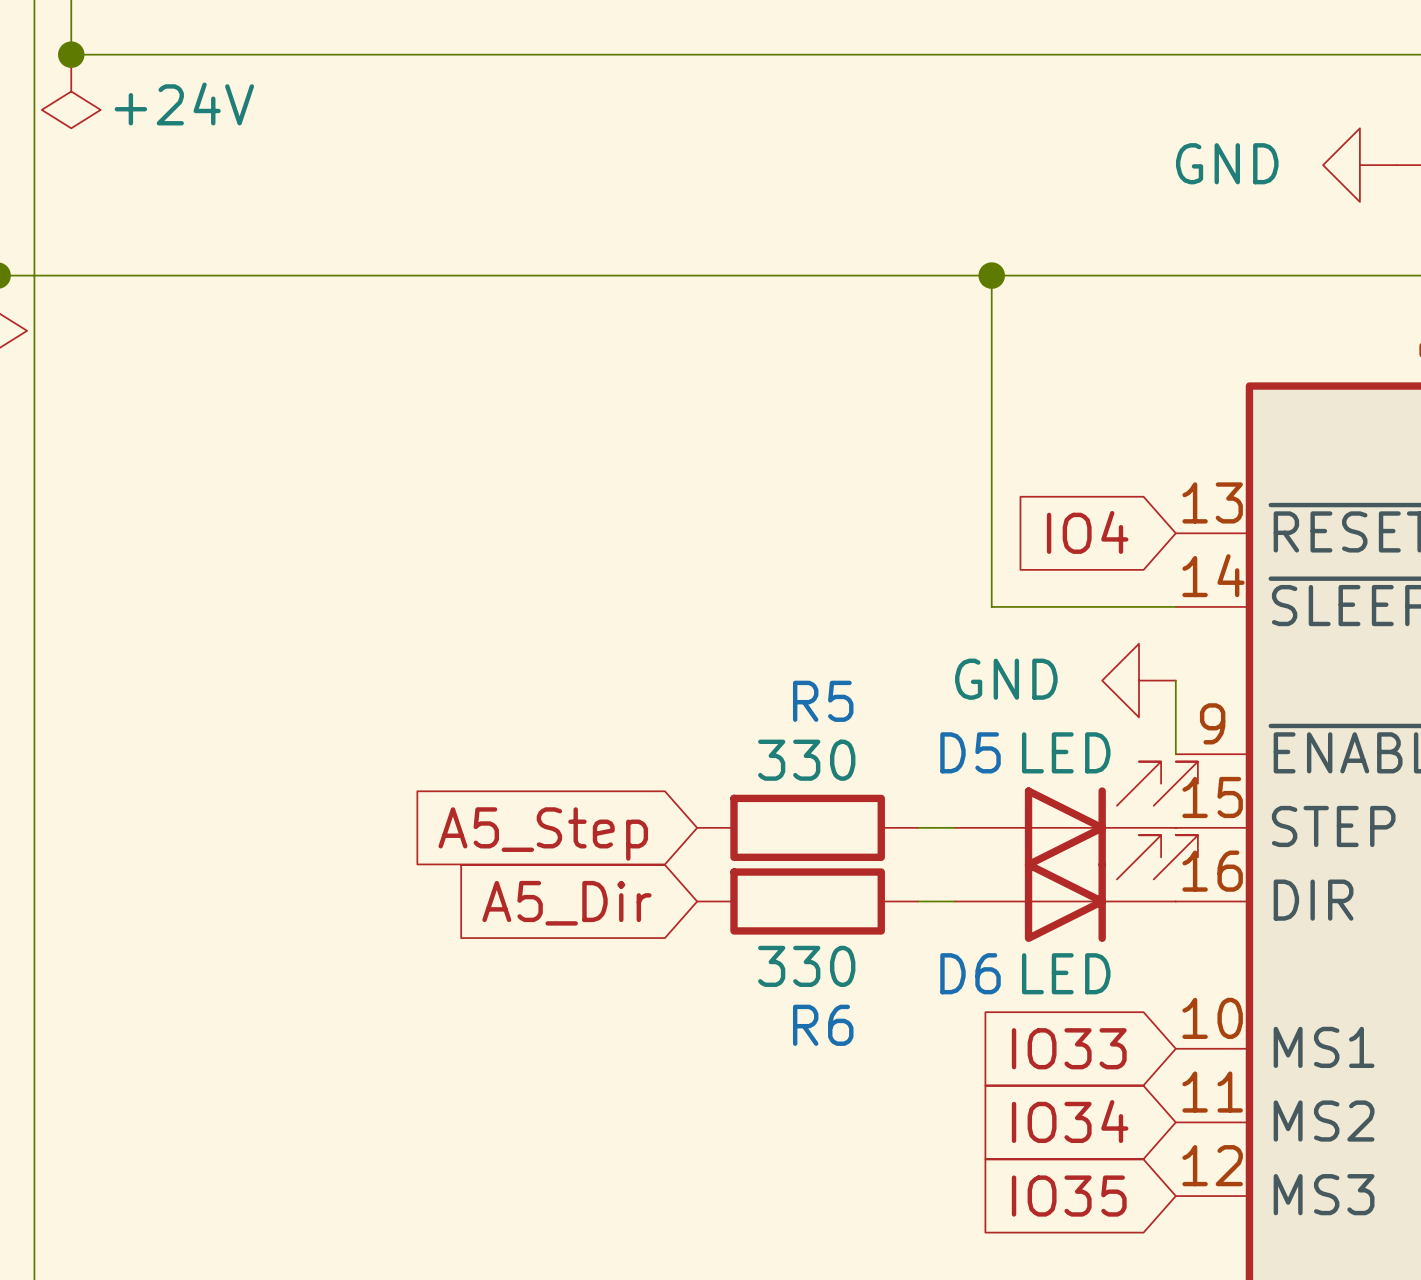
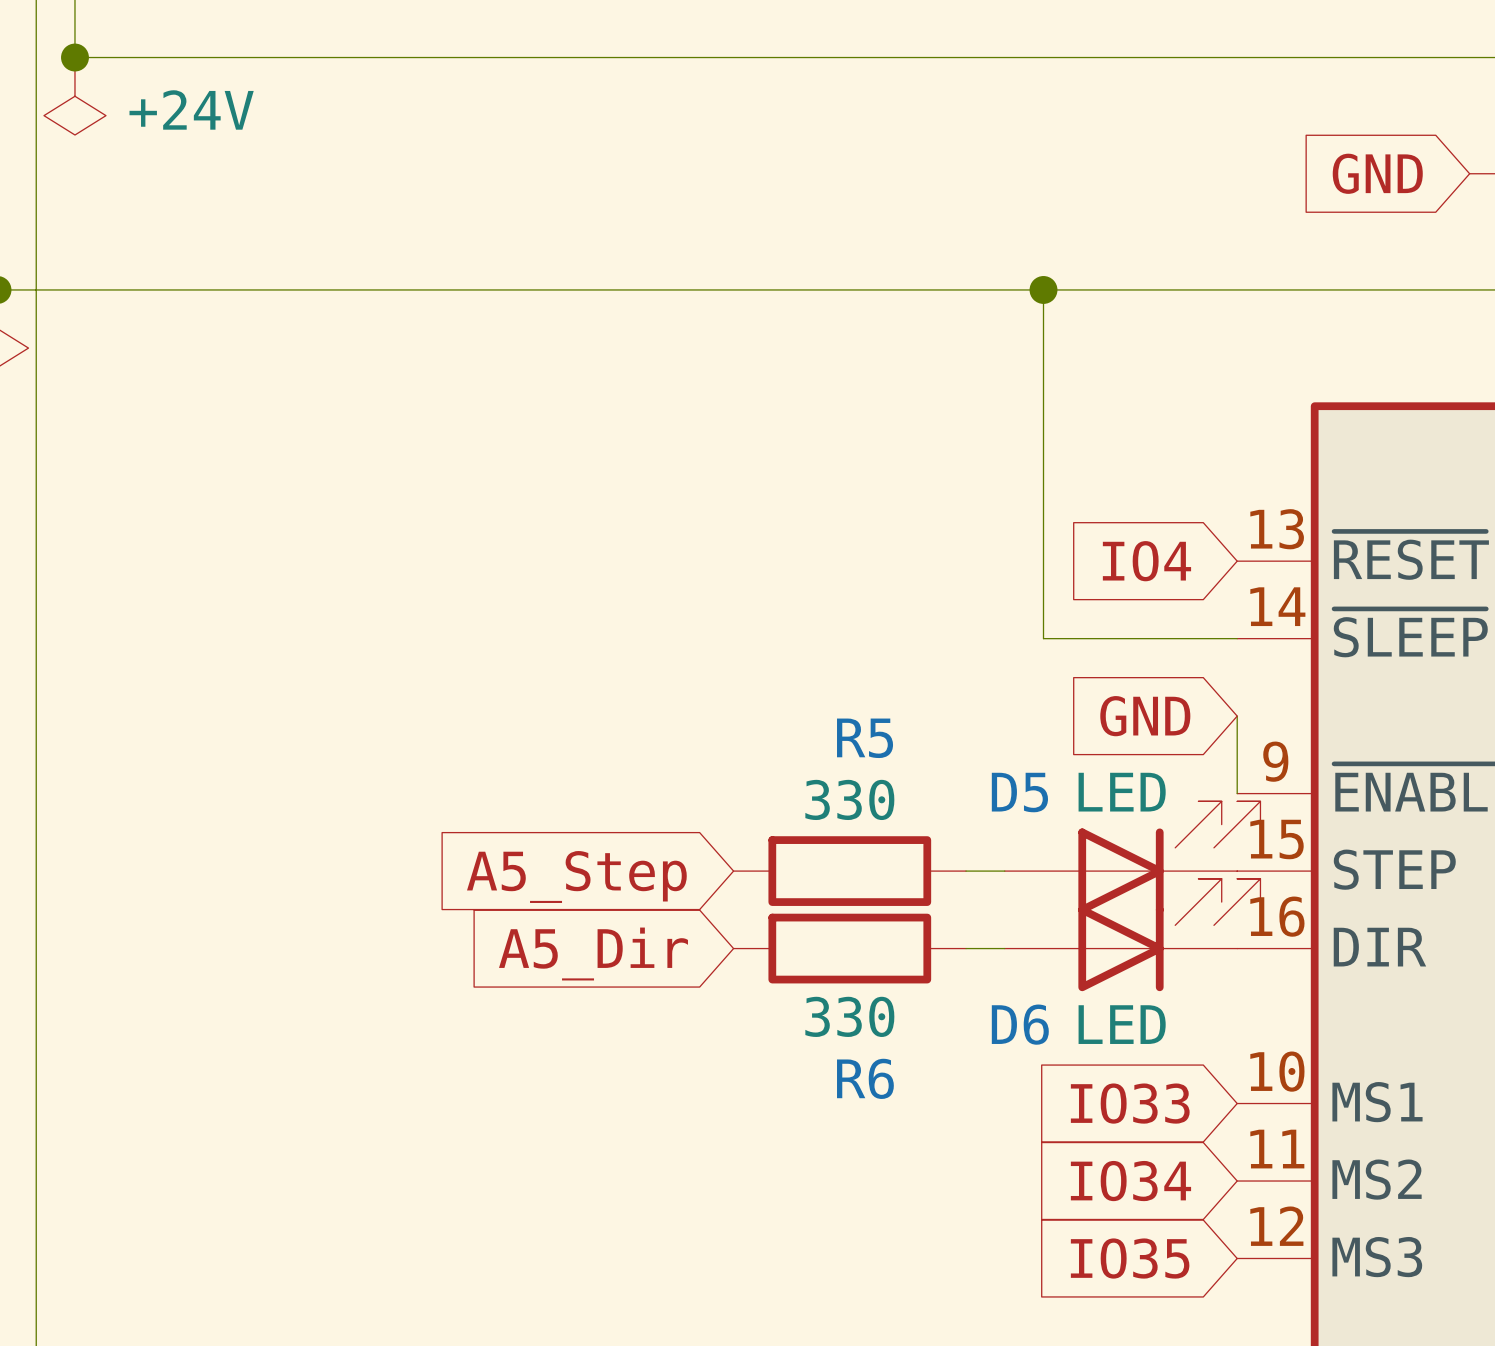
global label: none -> GND (1377, 173)
power symbol: GND (1359, 165) -> none
global label: none -> GND (1145, 716)
power symbol: GND (1138, 680) -> none

